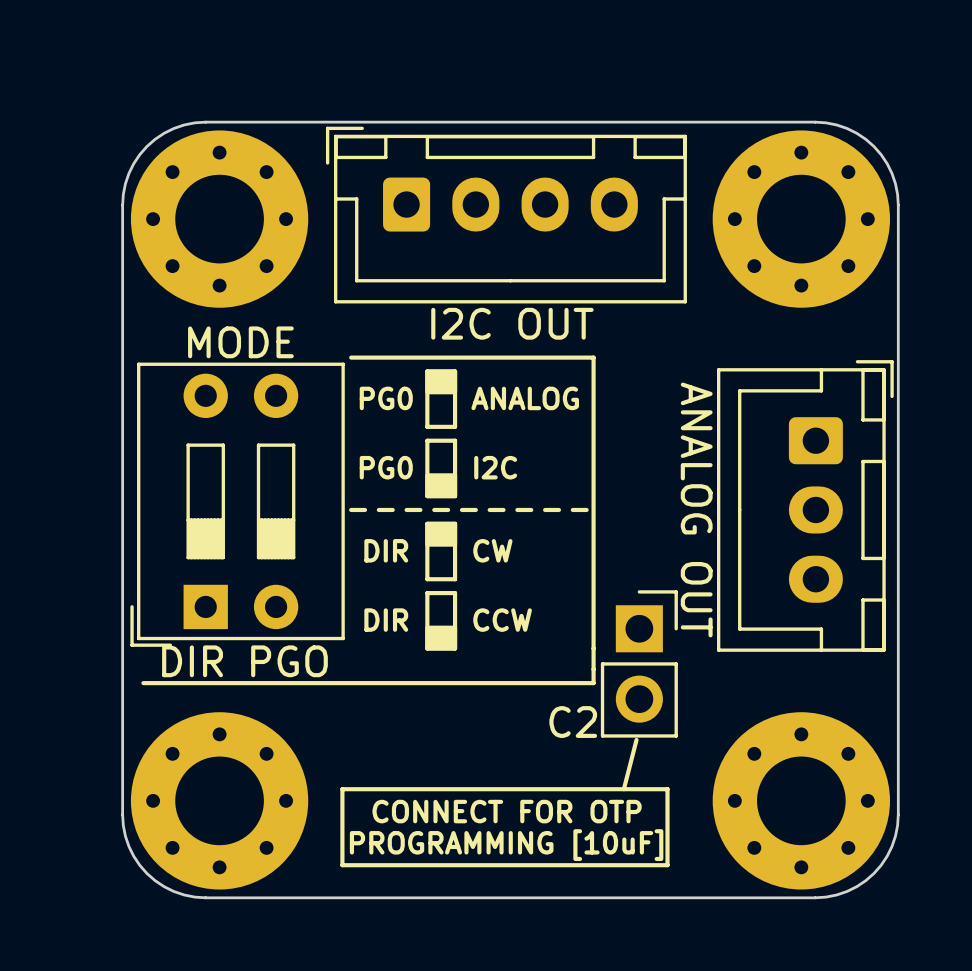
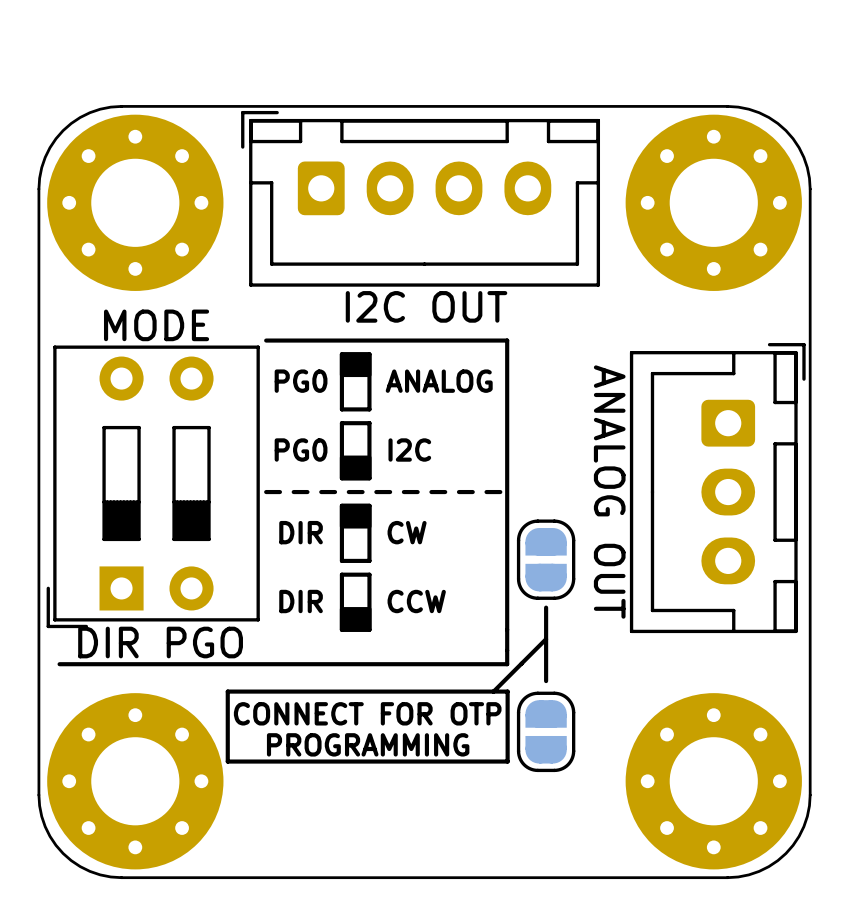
part: none -> (546, 559)
line: none -> (546, 607) (546, 681)
line: none -> (546, 639) (493, 691)
C2: (639, 663) -> none
line: none -> (507, 691) (227, 691) (227, 761) (507, 761) (507, 691)
line: (636, 739) (623, 789) -> none
part: none -> (546, 731)
text: none -> PROGRAMMING (368, 744)
line: (667, 789) (342, 789) (342, 865) (667, 865) (667, 789) -> none
text position: CONNECT FOR OTP (507, 811) -> CONNECT FOR OTP (367, 713)
text: PROGRAMMING [10uF] (506, 845) -> none

